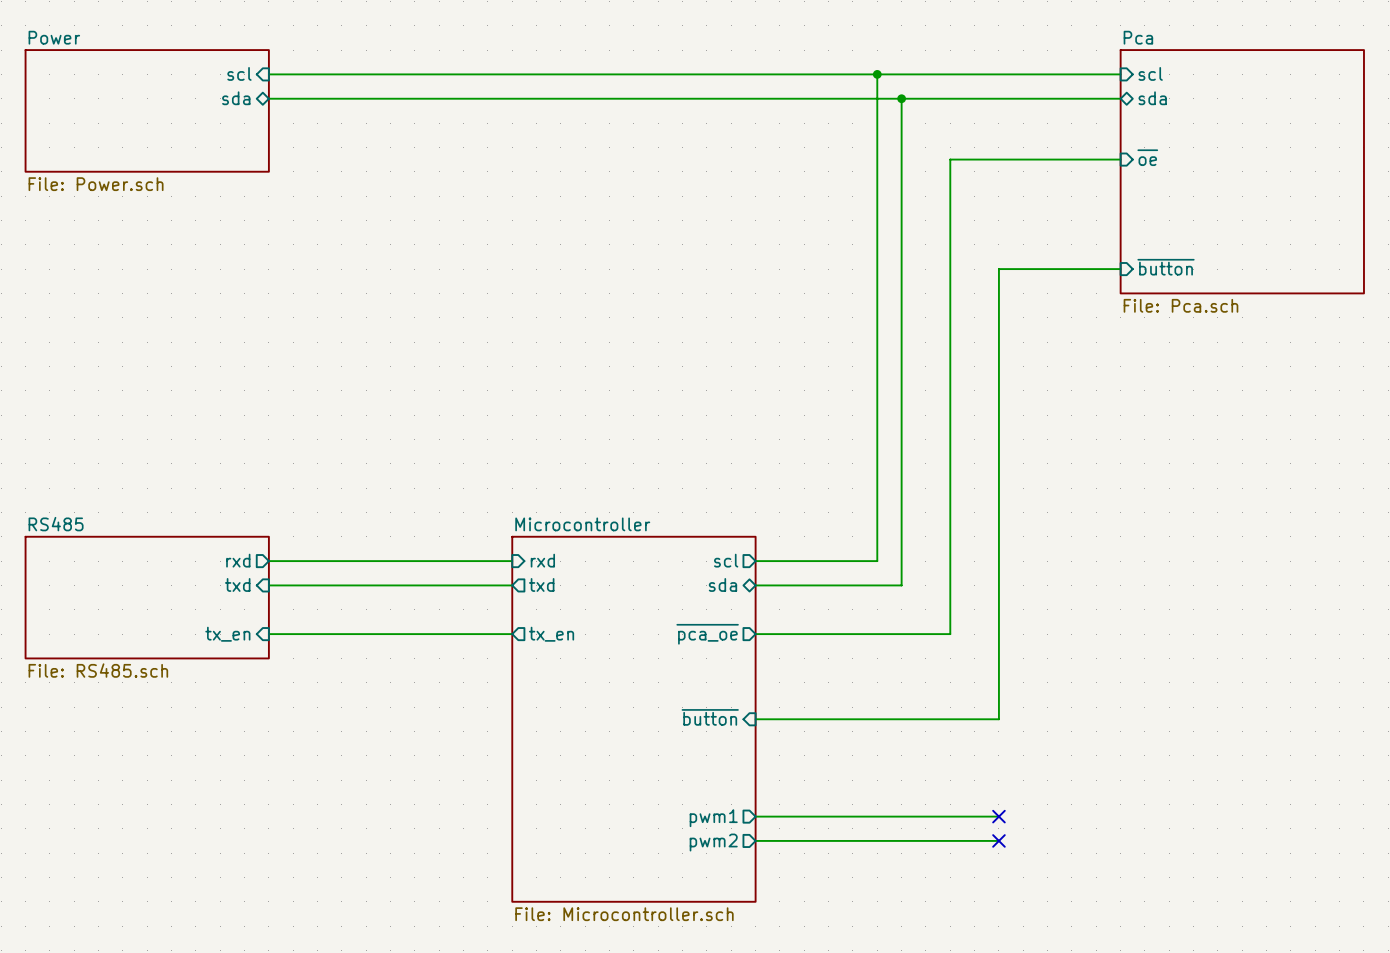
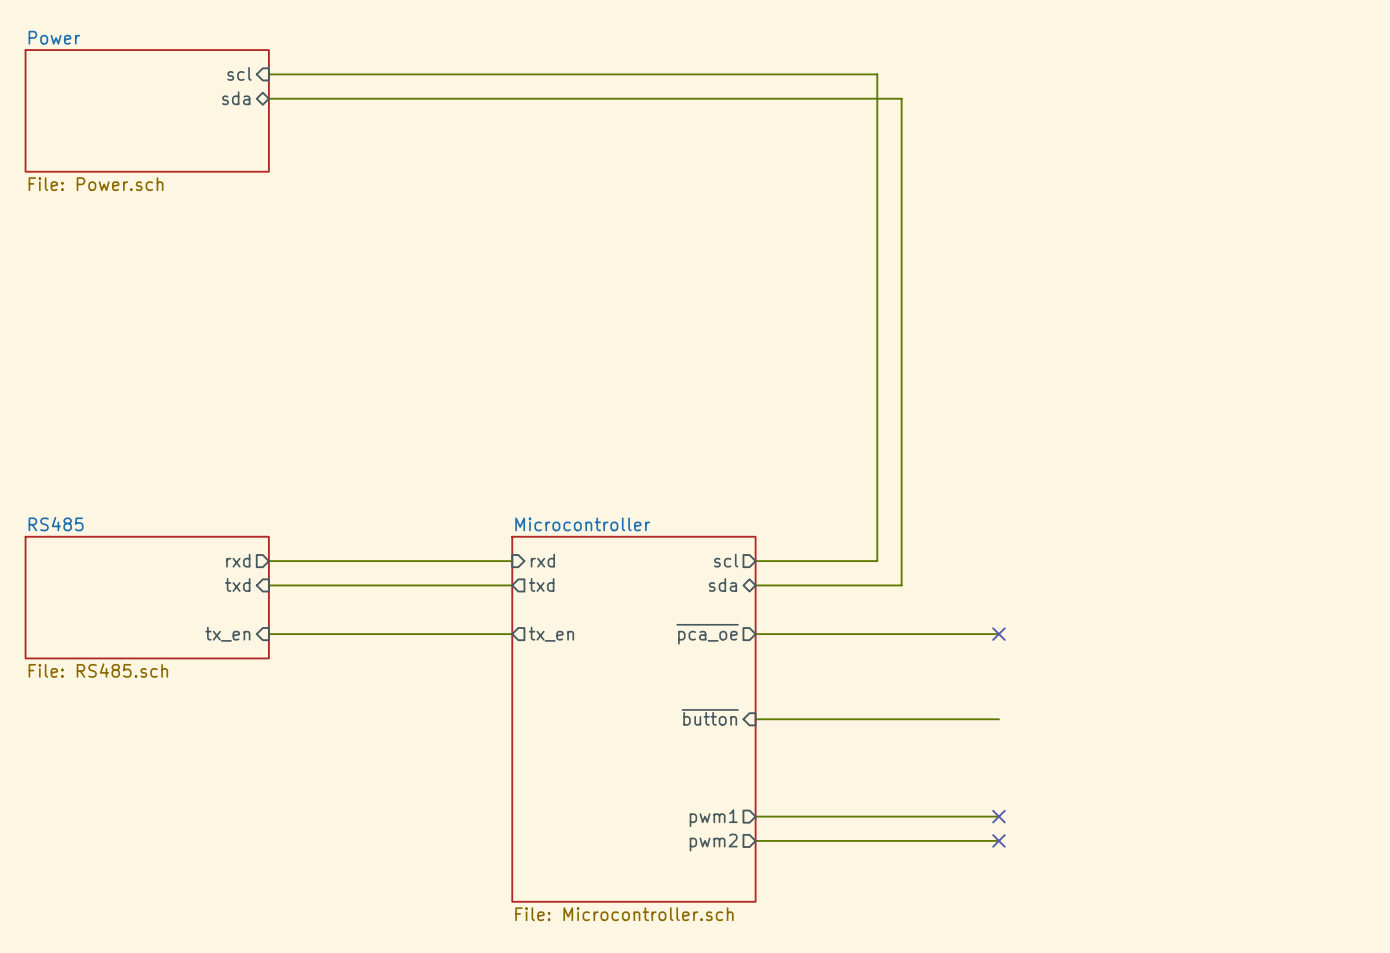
sheet pin: scl (1150, 73) -> none
wire: (877, 74) (1120, 74) -> none
junction: (877, 74) -> none
wire: (901, 98) (1120, 98) -> none
junction: (901, 98) -> none
sheet pin: sda (1152, 98) -> none
sheet pin: ~{oe} (1147, 157) -> none
wire: (1120, 159) (950, 159) (950, 634) -> (998, 634) (950, 634)
sheet Pca: File: Pca.sch (1242, 171) -> none
sheet pin: ~{button} (1166, 267) -> none
wire: (1120, 269) (998, 269) (998, 719) -> none
no-connect mark: none -> (998, 634)

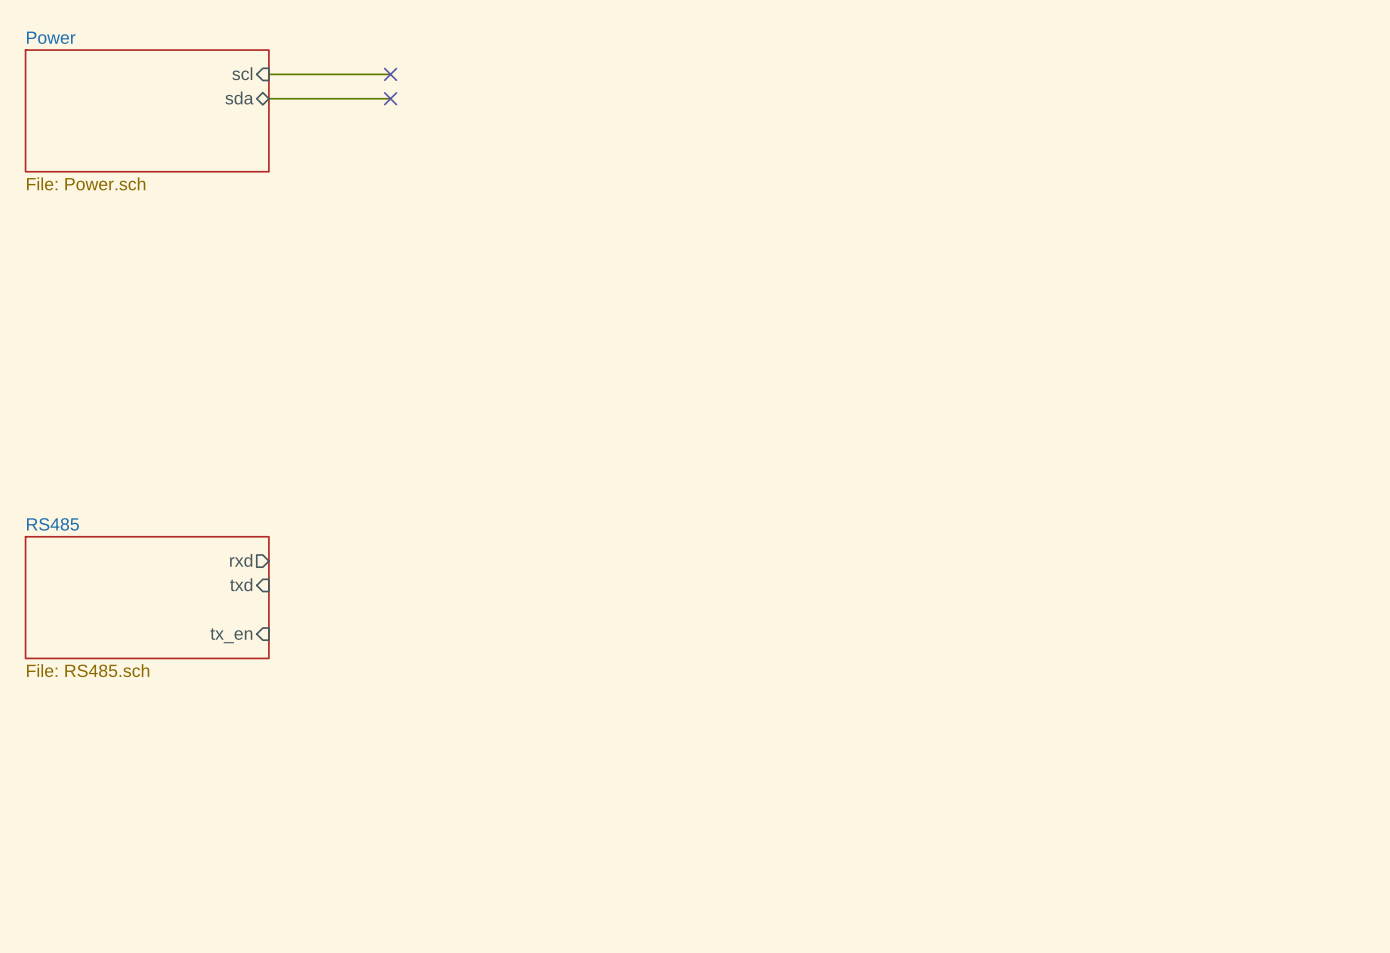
wire: (390, 74) (877, 74) (877, 561) (755, 561) -> none
no-connect mark: none -> (390, 74)
wire: (390, 98) (901, 98) (901, 585) (755, 585) -> none
no-connect mark: none -> (390, 98)
sheet pin: rxd (542, 560) -> none
sheet pin: scl (726, 560) -> none
wire: (268, 561) (512, 561) -> none
sheet pin: txd (541, 584) -> none
sheet pin: sda (722, 584) -> none
wire: (268, 585) (512, 585) -> none
wire: (268, 634) (512, 634) -> none
sheet pin: tx_en (551, 634) -> none
sheet pin: ~{pca_oe} (707, 634) -> none
wire: (755, 634) (998, 634) -> none
no-connect mark: (998, 634) -> none
sheet pin: ~{button} (710, 717) -> none
sheet Microcontroller: File: Microcontroller.sch (633, 719) -> none
wire: (755, 719) (998, 719) -> none
wire: (755, 816) (998, 816) -> none
no-connect mark: (998, 816) -> none
sheet pin: pwm1 (713, 818) -> none
wire: (755, 840) (998, 840) -> none
no-connect mark: (998, 840) -> none
sheet pin: pwm2 (713, 842) -> none

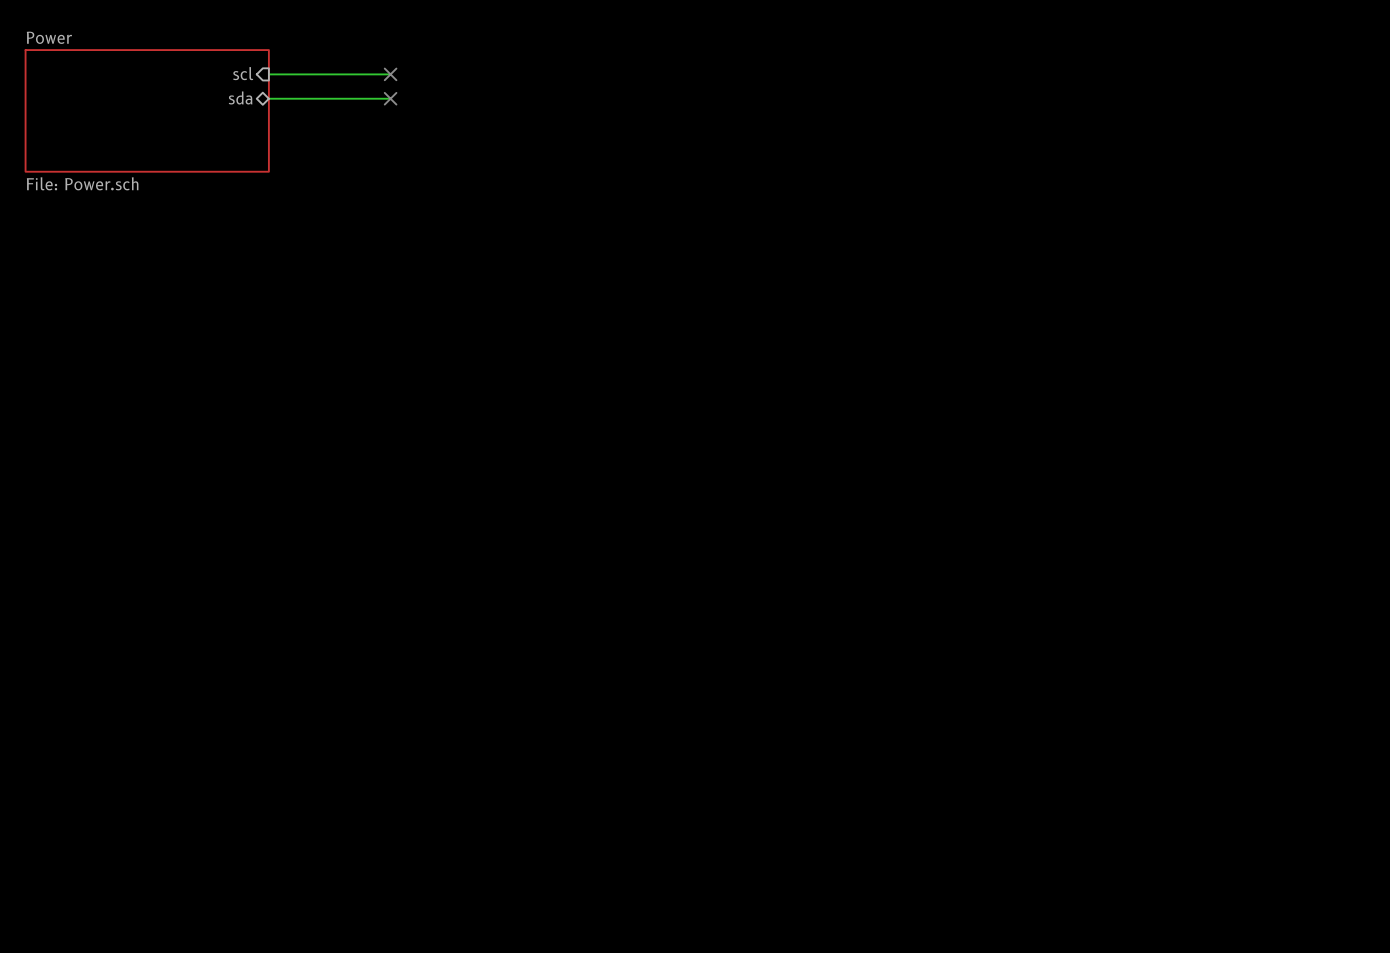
sheet pin: rxd (241, 560) -> none
sheet pin: txd (241, 584) -> none
sheet RS485: File: RS485.sch (147, 597) -> none
sheet pin: tx_en (231, 635) -> none

